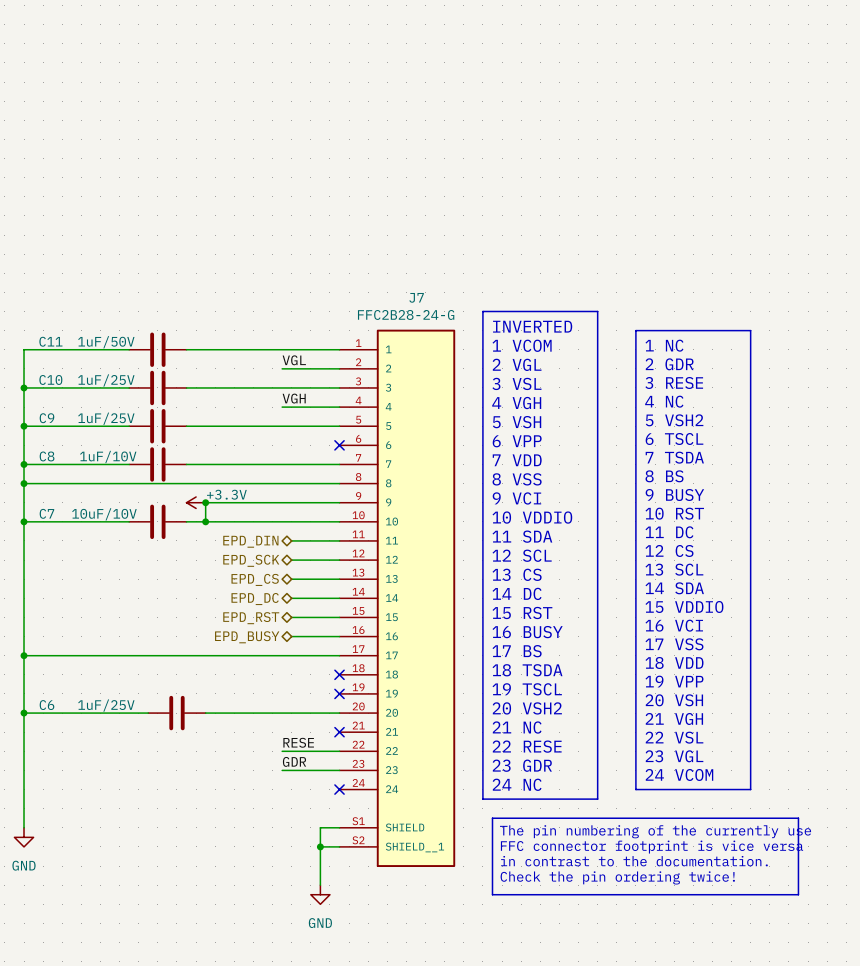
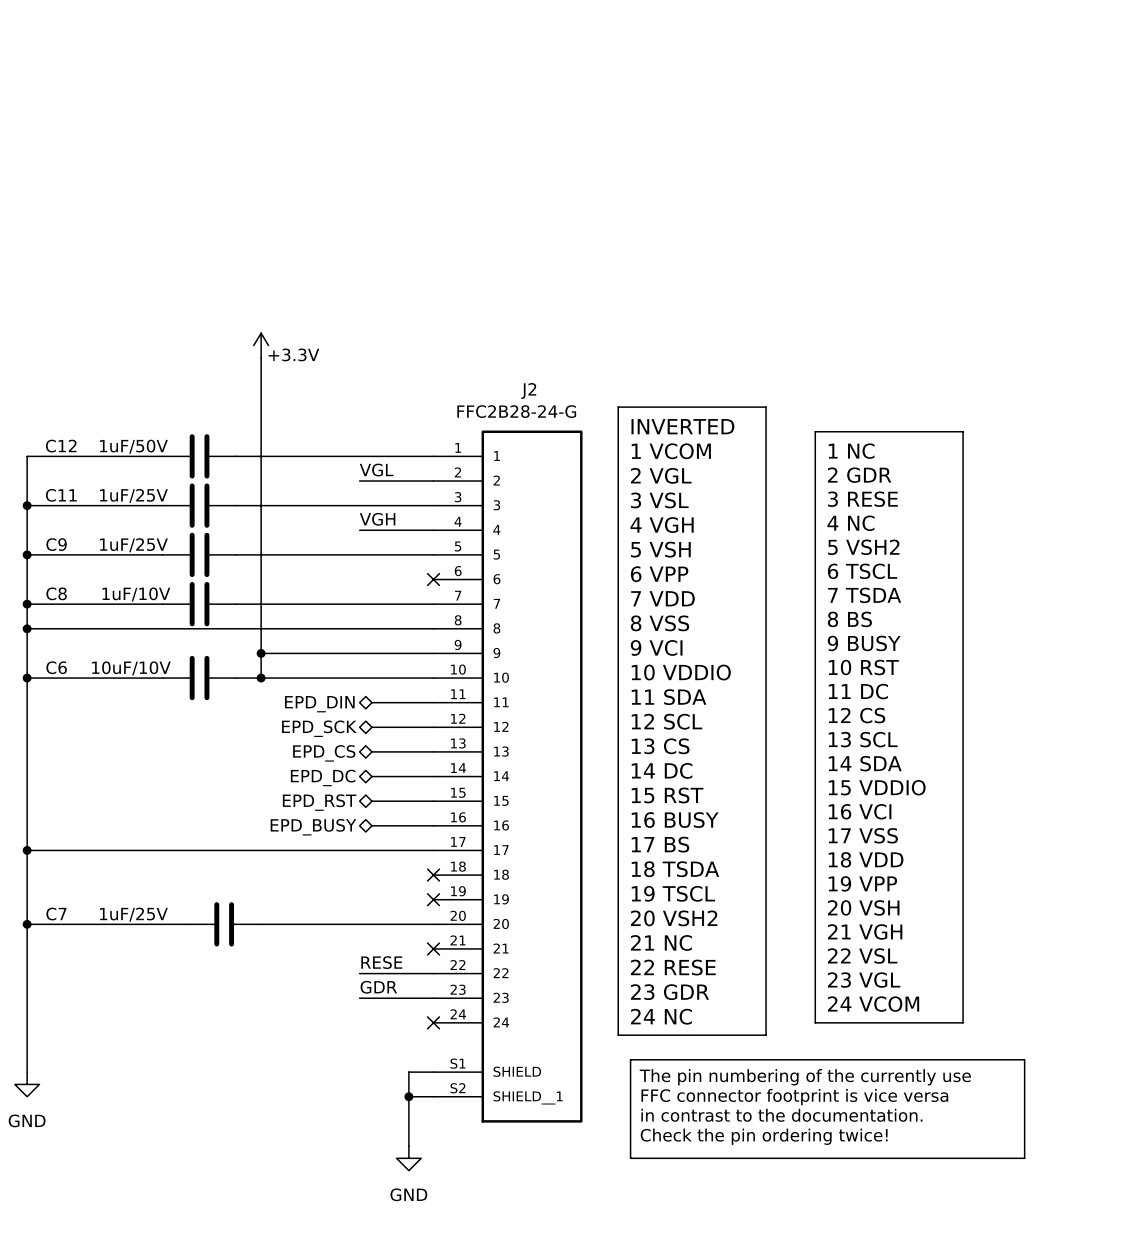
power symbol: none -> +3.3V (261, 345)
wire: none -> (261, 357) (261, 653)
J7 name: J7 (416, 297) -> J2 (528, 390)
C11 name: C11 (50, 341) -> C12 (61, 446)
C10 name: C10 (50, 379) -> C11 (61, 495)
power symbol: +3.3V (196, 502) -> none
C7 name: C7 (46, 513) -> C6 (56, 667)
C6 name: C6 (46, 705) -> C7 (56, 914)

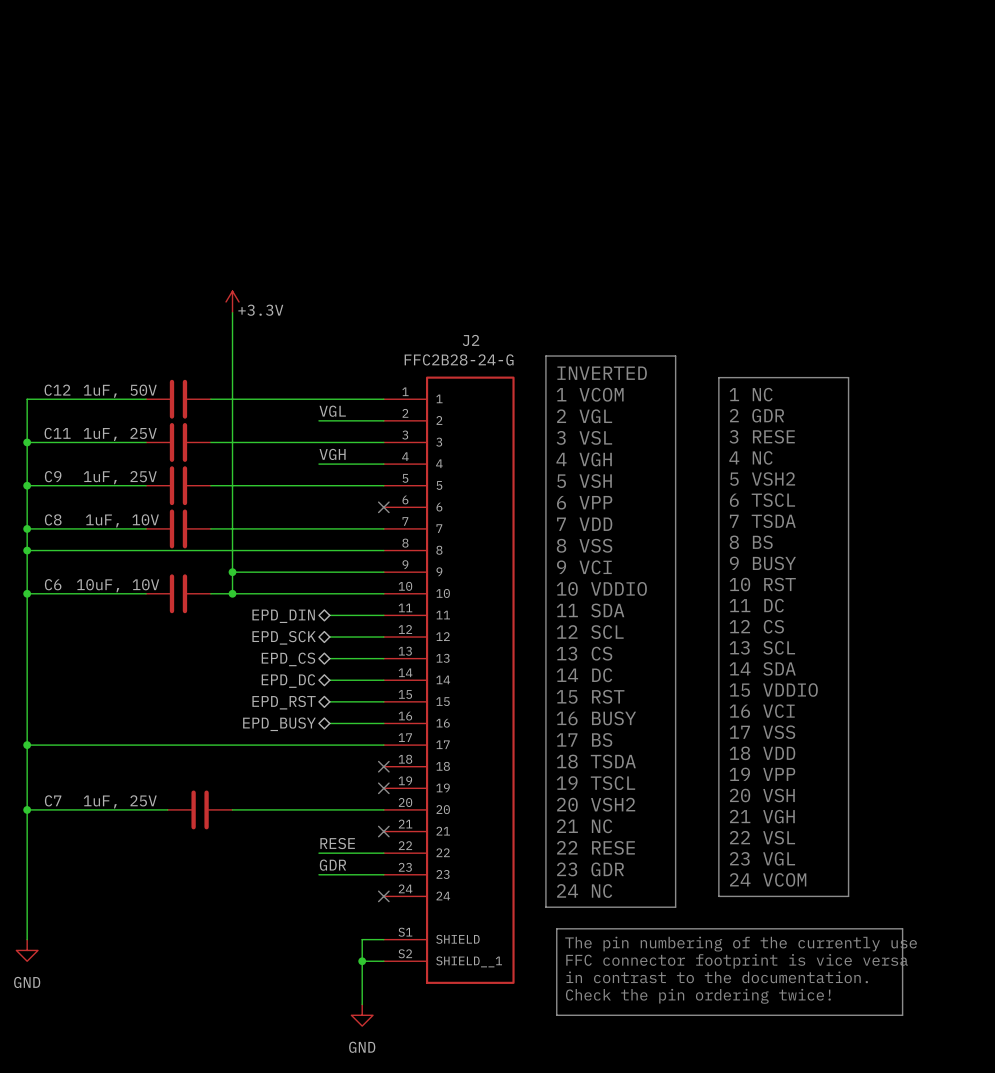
C12 value: 1uF/50V (133, 446) -> 1uF, 50V (120, 391)
C11 value: 1uF/25V (133, 495) -> 1uF, 25V (120, 434)
C9 value: 1uF/25V (133, 545) -> 1uF, 25V (120, 477)
C8 value: 1uF/10V (136, 594) -> 1uF, 10V (122, 520)
C6 value: 10uF/10V (131, 668) -> 10uF, 10V (118, 585)
C7 value: 1uF/25V (133, 914) -> 1uF, 25V (120, 801)

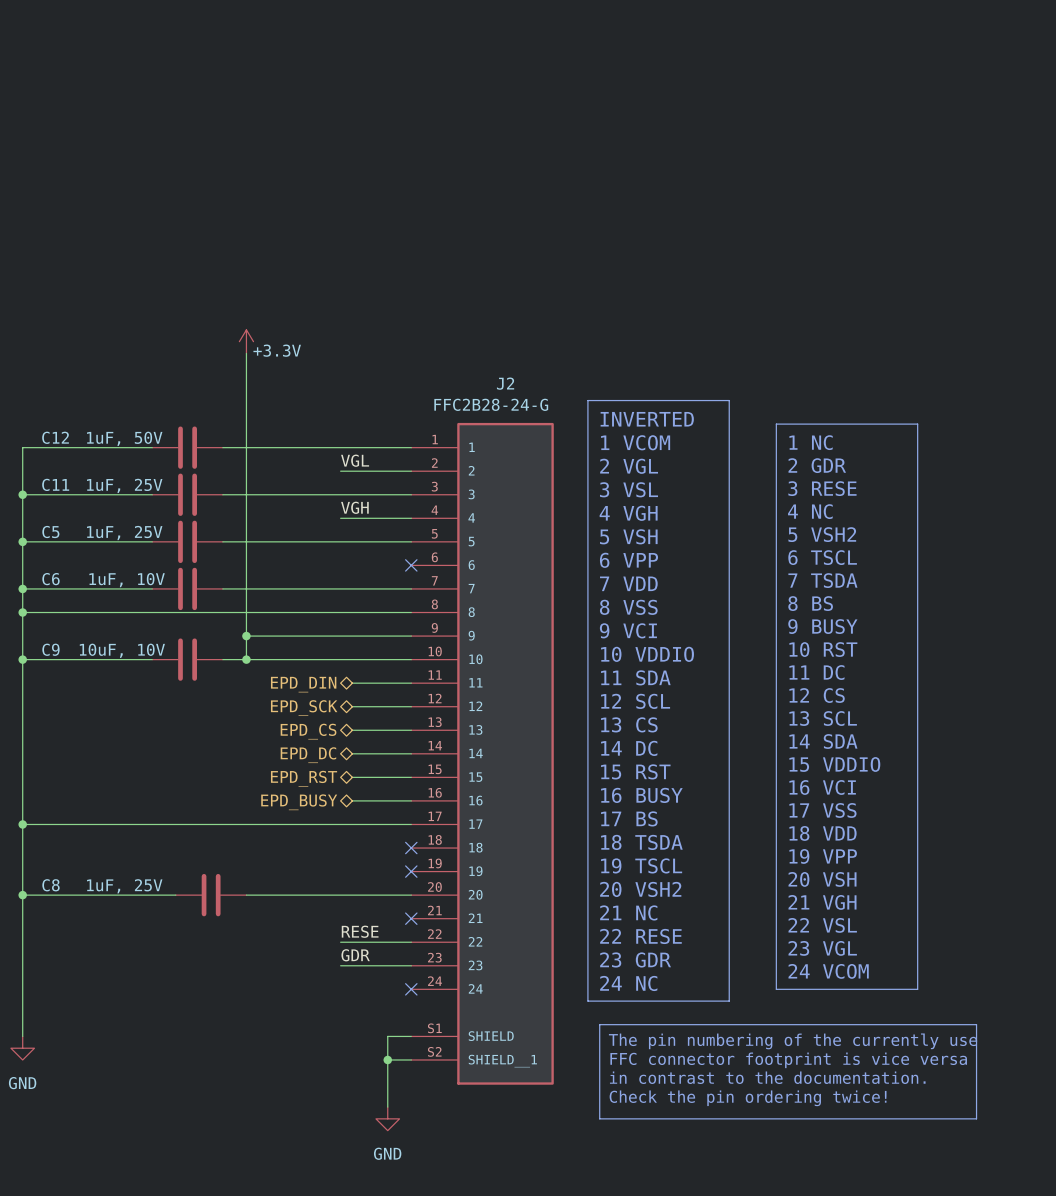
C9 name: C9 (53, 476) -> C5 (50, 532)
C8 name: C8 (53, 519) -> C6 (50, 579)
C6 name: C6 (53, 584) -> C9 (50, 649)
C7 name: C7 (53, 800) -> C8 (50, 885)

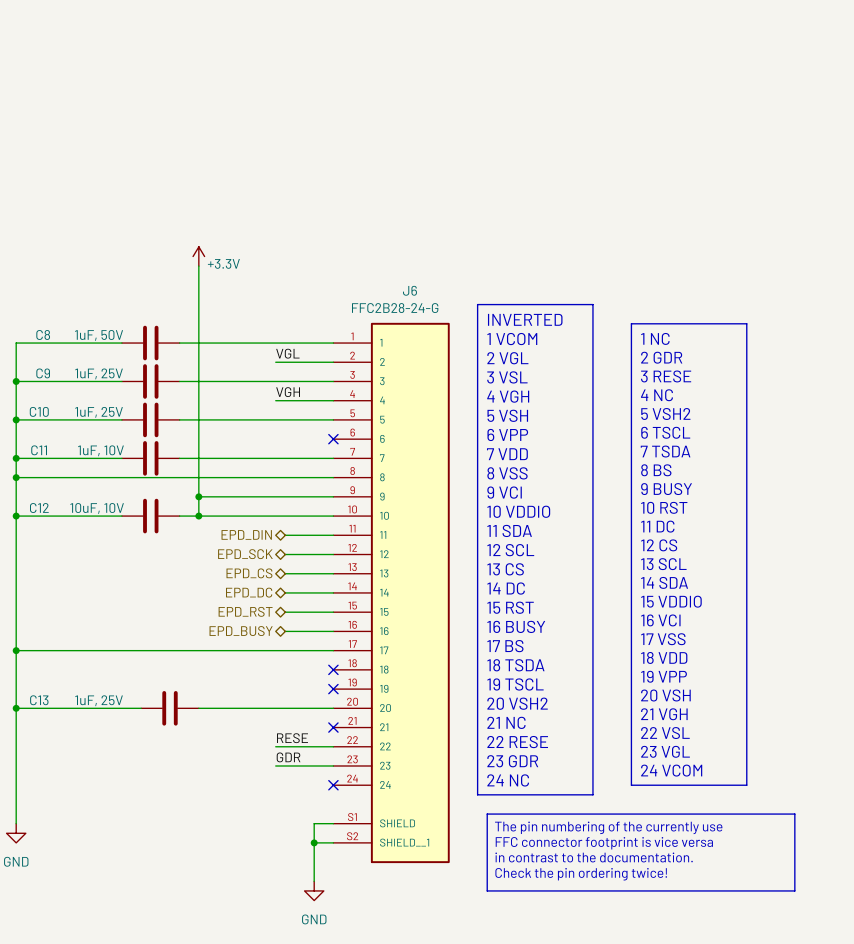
J2 name: J2 (505, 383) -> J6 (409, 290)
C12 name: C12 (55, 437) -> C8 (43, 334)
C11 name: C11 (55, 484) -> C9 (43, 373)
C5 name: C5 (50, 532) -> C10 (39, 411)
C6 name: C6 (50, 579) -> C11 (39, 450)
C9 name: C9 (50, 649) -> C12 (39, 508)
C8 name: C8 (50, 885) -> C13 (39, 700)

